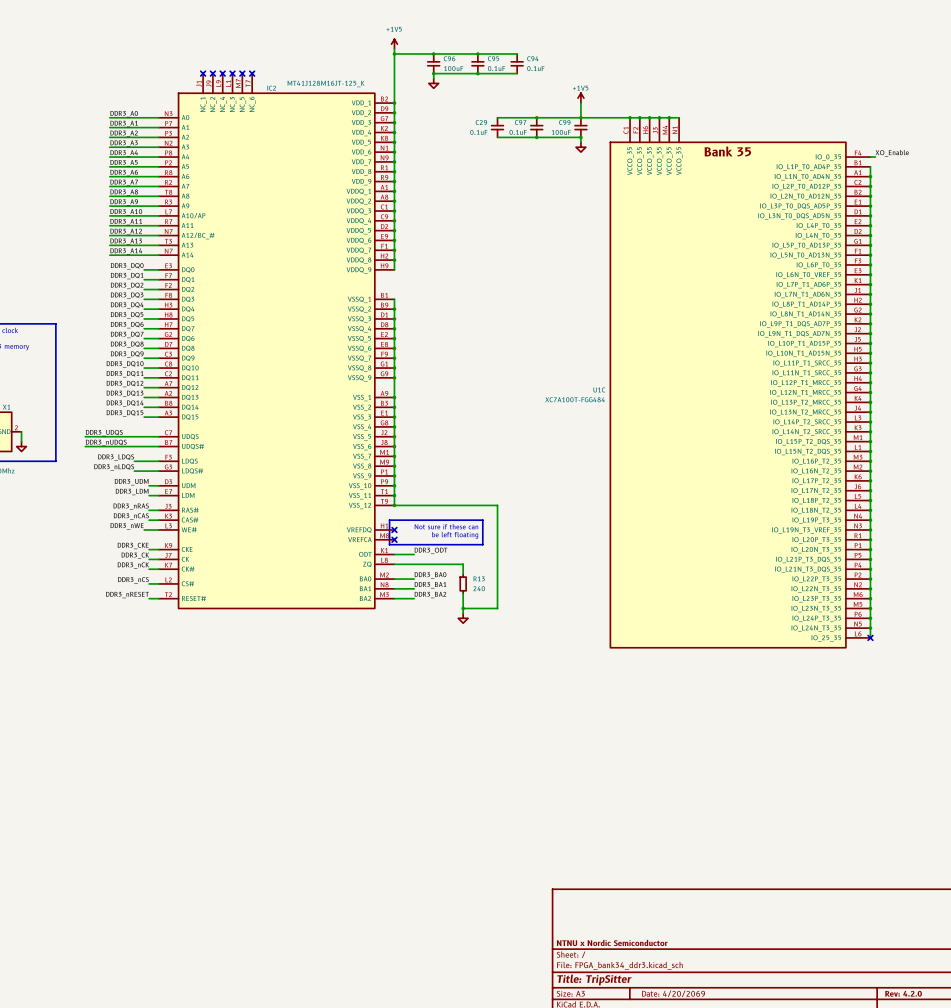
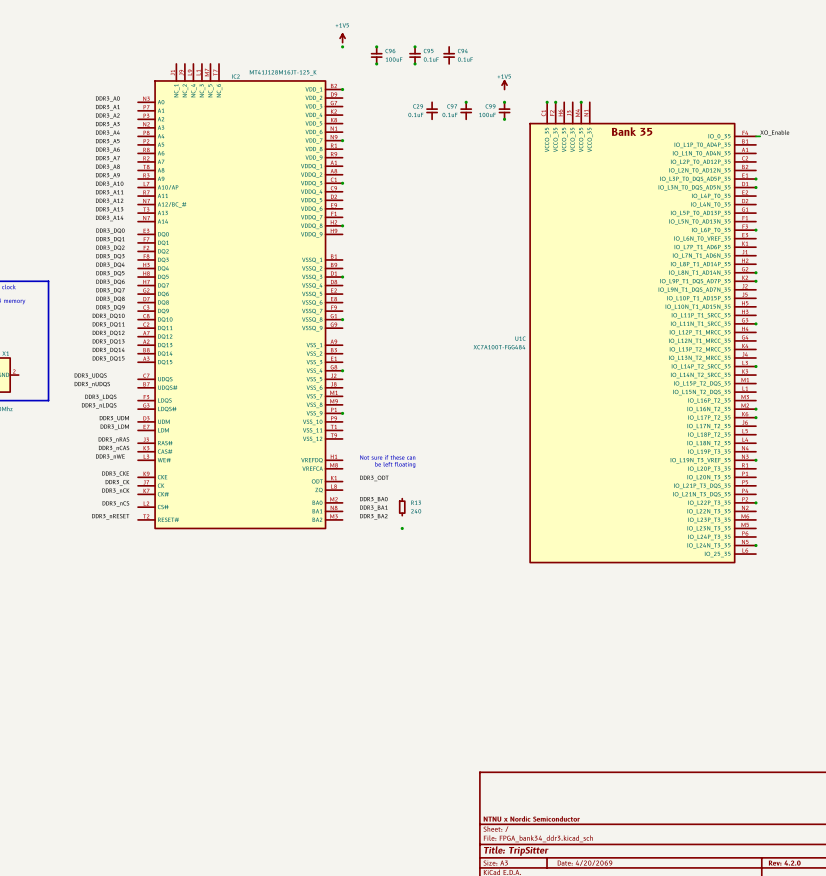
wire: (394, 49) (394, 269) -> none
wire: (394, 53) (517, 53) -> none
no-connect mark: (203, 73) -> none
no-connect mark: (212, 73) -> none
no-connect mark: (222, 73) -> none
no-connect mark: (232, 73) -> none
no-connect mark: (242, 73) -> none
no-connect mark: (252, 73) -> none
wire: (517, 73) (433, 73) (433, 78) -> none
power symbol: (433, 83) -> none
wire: (580, 103) (580, 117) -> none
junction: (394, 112) -> none
wire: (109, 117) (158, 117) -> none
wire: (497, 117) (679, 117) -> none
junction: (649, 117) -> none
junction: (659, 117) -> none
junction: (394, 122) -> none
wire: (109, 127) (158, 127) -> none
junction: (394, 132) -> none
wire: (109, 137) (158, 137) -> none
wire: (497, 137) (580, 137) (580, 142) -> none
junction: (536, 137) -> none
junction: (394, 142) -> none
wire: (109, 147) (158, 147) -> none
power symbol: (580, 147) -> none
junction: (394, 152) -> none
wire: (109, 157) (158, 157) -> none
wire: (109, 166) (158, 166) -> none
wire: (870, 166) (870, 637) -> none
junction: (394, 171) -> none
wire: (109, 176) (158, 176) -> none
junction: (870, 176) -> none
junction: (394, 181) -> none
wire: (109, 186) (158, 186) -> none
junction: (870, 186) -> none
junction: (394, 191) -> none
wire: (109, 196) (158, 196) -> none
junction: (870, 196) -> none
junction: (394, 201) -> none
wire: (109, 206) (158, 206) -> none
wire: (109, 215) (158, 215) -> none
junction: (394, 220) -> none
wire: (109, 225) (158, 225) -> none
junction: (870, 225) -> none
junction: (394, 230) -> none
wire: (109, 235) (158, 235) -> none
junction: (870, 235) -> none
junction: (394, 240) -> none
wire: (109, 245) (158, 245) -> none
junction: (870, 245) -> none
junction: (394, 250) -> none
wire: (109, 255) (158, 255) -> none
junction: (870, 255) -> none
wire: (144, 269) (158, 269) -> none
junction: (870, 274) -> none
wire: (144, 279) (158, 279) -> none
junction: (870, 284) -> none
wire: (144, 289) (158, 289) -> none
junction: (870, 294) -> none
wire: (144, 299) (158, 299) -> none
wire: (394, 299) (394, 505) (497, 505) (497, 608) (463, 608) -> none
junction: (870, 304) -> none
wire: (144, 309) (158, 309) -> none
junction: (394, 309) -> none
wire: (144, 318) (158, 318) -> none
wire: (144, 328) (158, 328) -> none
junction: (394, 328) -> none
junction: (870, 333) -> none
wire: (144, 338) (158, 338) -> none
junction: (394, 338) -> none
junction: (870, 343) -> none
wire: (144, 348) (158, 348) -> none
junction: (394, 348) -> none
junction: (870, 353) -> none
wire: (144, 358) (158, 358) -> none
junction: (394, 358) -> none
junction: (870, 363) -> none
wire: (144, 368) (158, 368) -> none
wire: (144, 377) (158, 377) -> none
junction: (394, 377) -> none
junction: (870, 382) -> none
wire: (144, 387) (158, 387) -> none
junction: (870, 392) -> none
wire: (144, 397) (158, 397) -> none
junction: (394, 397) -> none
junction: (870, 402) -> none
wire: (144, 407) (158, 407) -> none
junction: (394, 407) -> none
junction: (870, 412) -> none
wire: (144, 417) (158, 417) -> none
junction: (394, 417) -> none
wire: (21, 431) (21, 441) -> none
junction: (870, 431) -> none
wire: (85, 436) (158, 436) -> none
junction: (394, 436) -> none
junction: (870, 441) -> none
power symbol: (21, 446) -> none
wire: (85, 446) (158, 446) -> none
junction: (394, 446) -> none
junction: (870, 451) -> none
junction: (394, 456) -> none
wire: (134, 461) (158, 461) -> none
junction: (870, 461) -> none
junction: (394, 466) -> none
wire: (134, 471) (158, 471) -> none
wire: (149, 485) (158, 485) -> none
junction: (394, 485) -> none
junction: (870, 490) -> none
wire: (149, 495) (158, 495) -> none
junction: (394, 495) -> none
junction: (870, 500) -> none
junction: (394, 505) -> none
wire: (149, 510) (158, 510) -> none
junction: (870, 510) -> none
wire: (149, 520) (158, 520) -> none
line: (389, 520) (482, 520) (482, 544) (389, 544) (389, 520) -> none
junction: (870, 520) -> none
wire: (144, 529) (158, 529) -> none
no-connect mark: (394, 529) -> none
no-connect mark: (394, 539) -> none
junction: (870, 539) -> none
wire: (149, 549) (158, 549) -> none
junction: (870, 549) -> none
wire: (394, 554) (414, 554) -> none
wire: (149, 559) (158, 559) -> none
junction: (870, 559) -> none
wire: (394, 564) (463, 564) (463, 574) -> none
wire: (149, 569) (158, 569) -> none
junction: (870, 569) -> none
wire: (394, 579) (414, 579) -> none
wire: (149, 583) (158, 583) -> none
wire: (394, 588) (414, 588) -> none
junction: (870, 588) -> none
wire: (463, 593) (463, 613) -> none
wire: (149, 598) (158, 598) -> none
wire: (394, 598) (414, 598) -> none
junction: (870, 598) -> none
junction: (870, 608) -> none
power symbol: (463, 618) -> none
junction: (870, 618) -> none
no-connect mark: (870, 637) -> none

